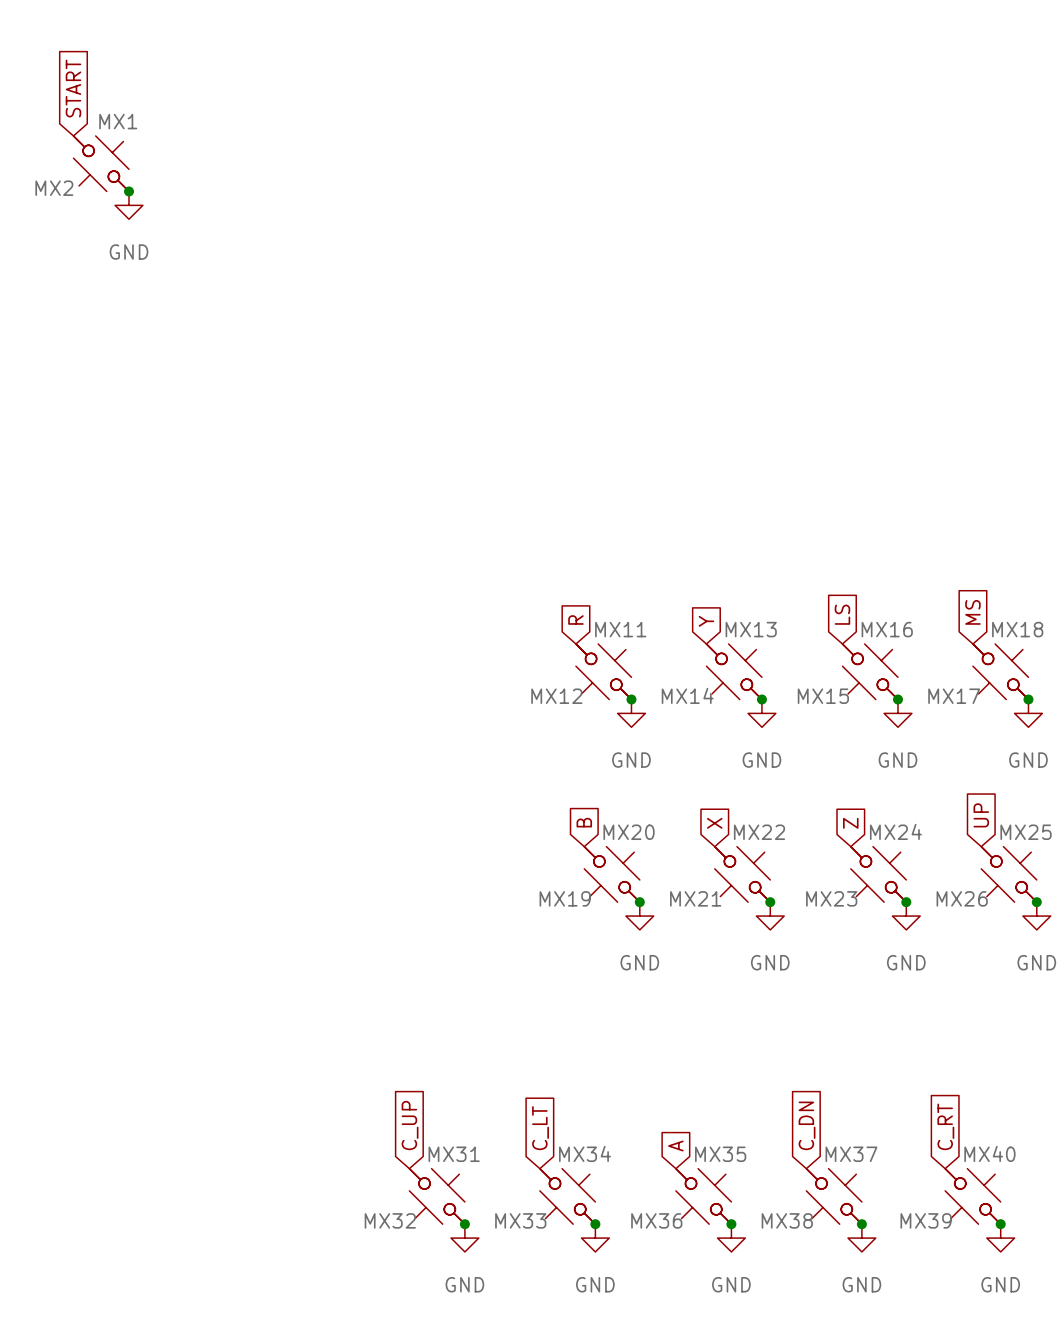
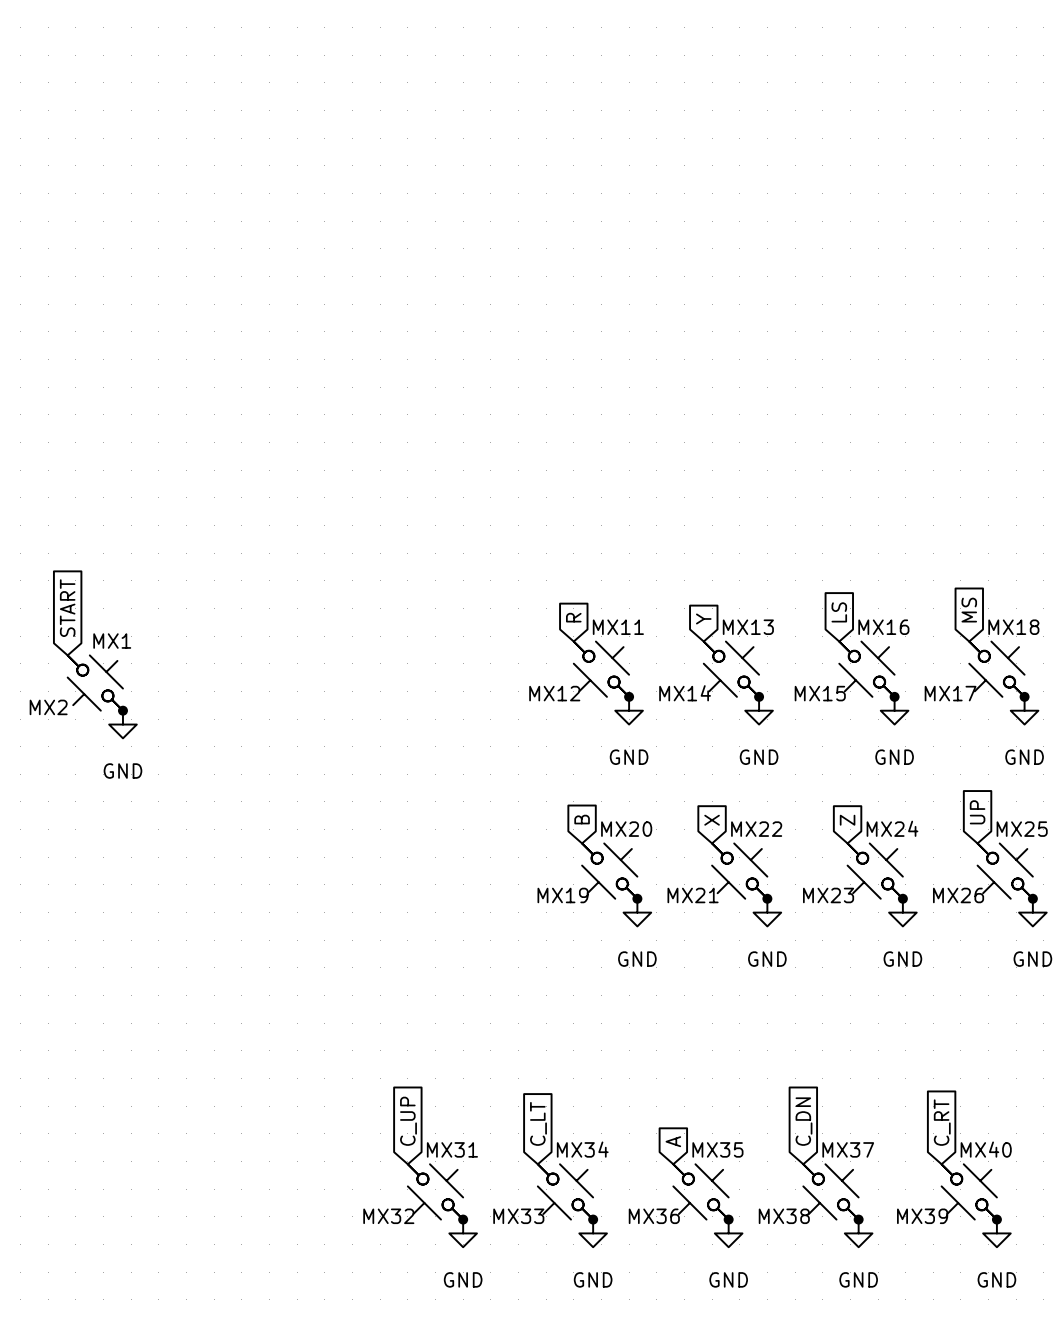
global label: START (73, 88) -> none
MX1 position: (101, 163) -> (95, 683)
MX2 position: (101, 163) -> (95, 683)
junction: (129, 191) -> none
power symbol: GND (129, 205) -> none
global label: none -> START (67, 608)
junction: none -> (122, 710)
power symbol: none -> GND (122, 724)

